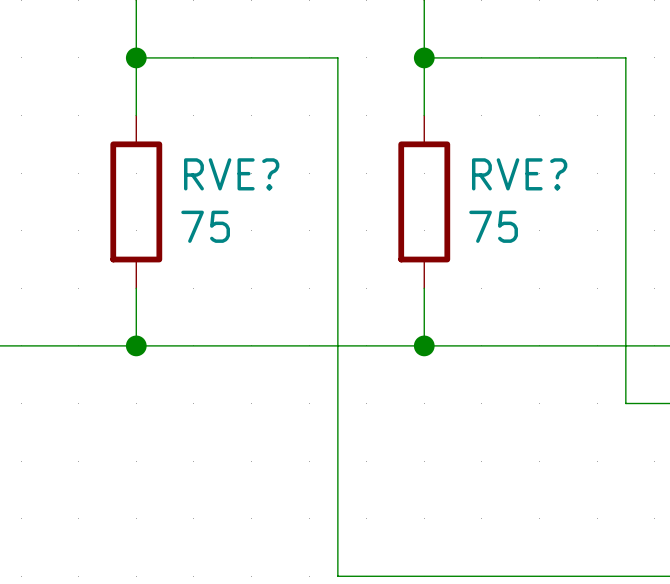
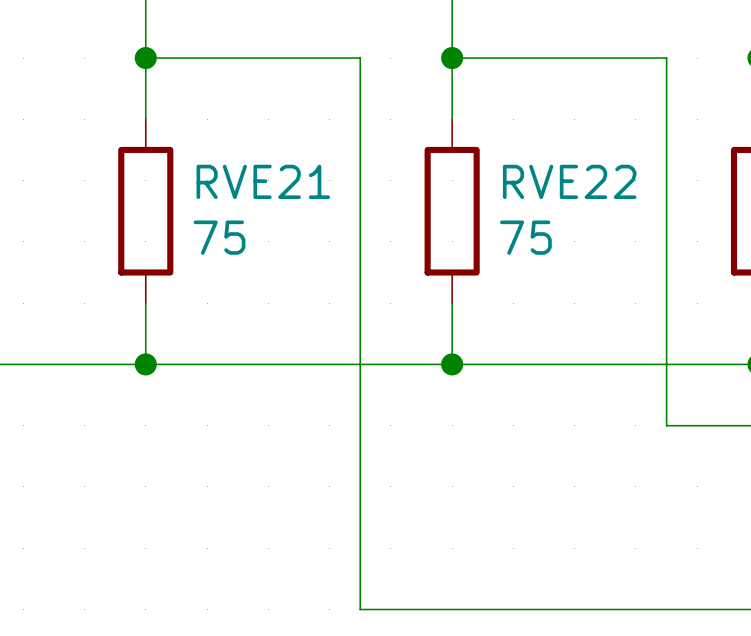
RVE? name: RVE? (231, 174) -> RVE21 (263, 181)
RVE? name: RVE? (519, 174) -> RVE22 (569, 181)

